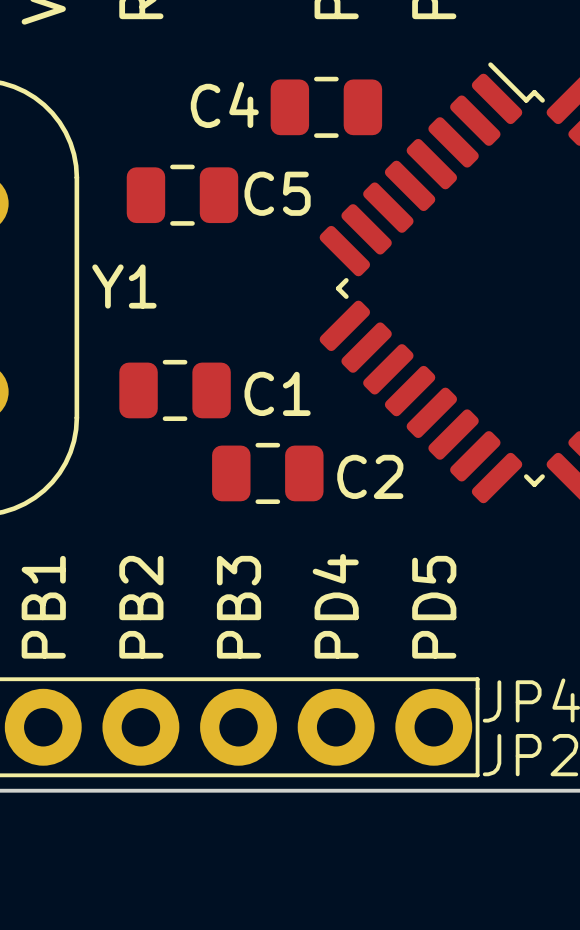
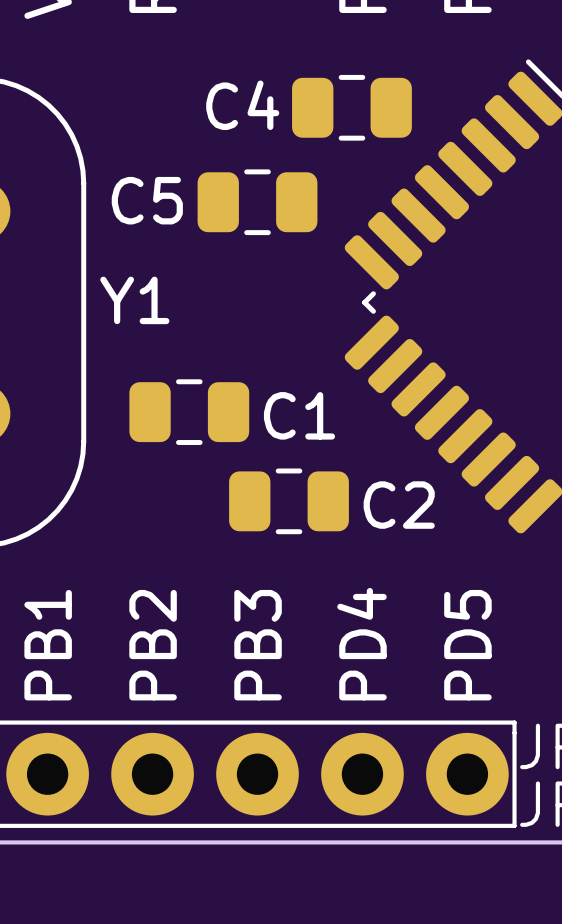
C5 name position: C5 (277, 193) -> C5 (147, 200)
C5 position: (182, 195) -> (257, 202)

